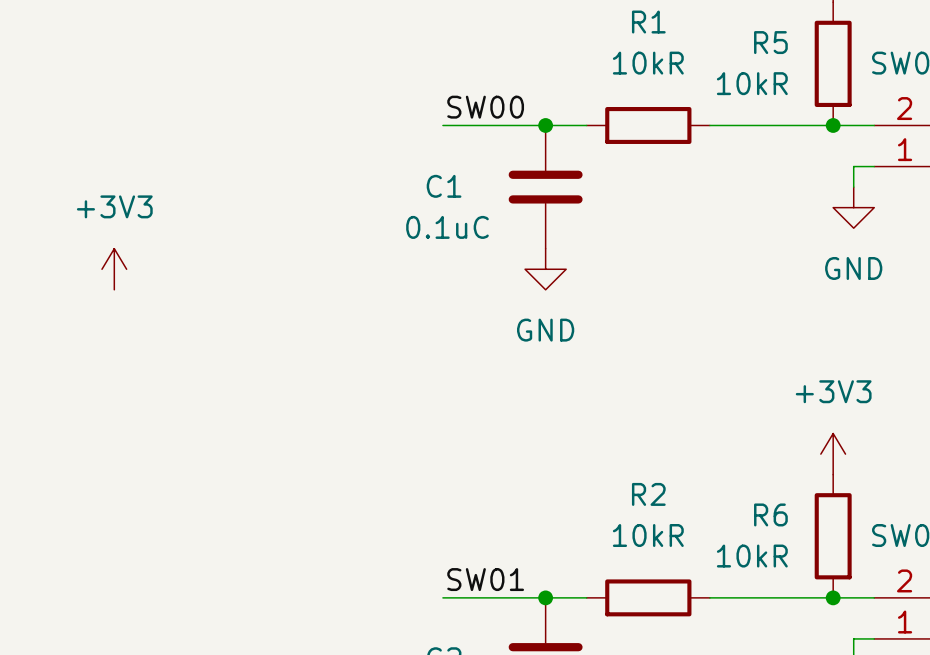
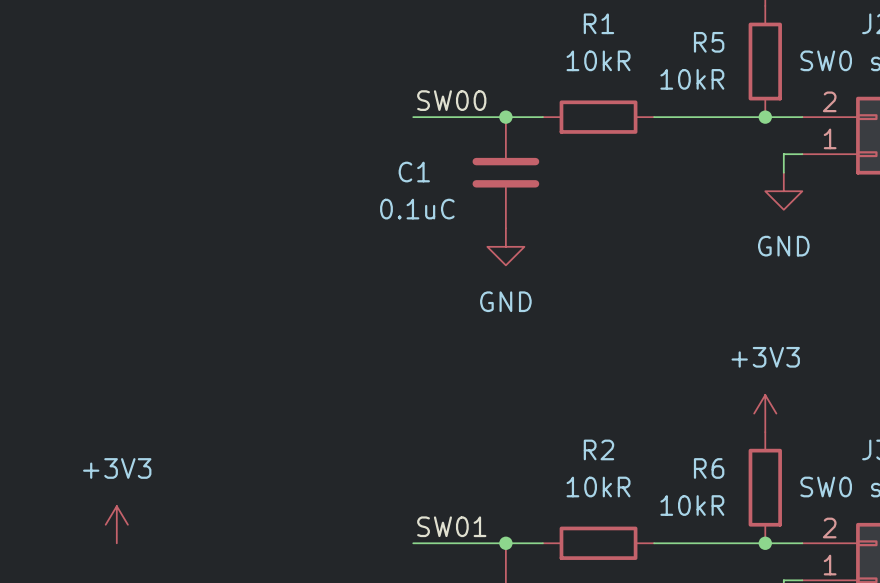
power symbol position: +3V3 (114, 269) -> +3V3 (116, 524)

